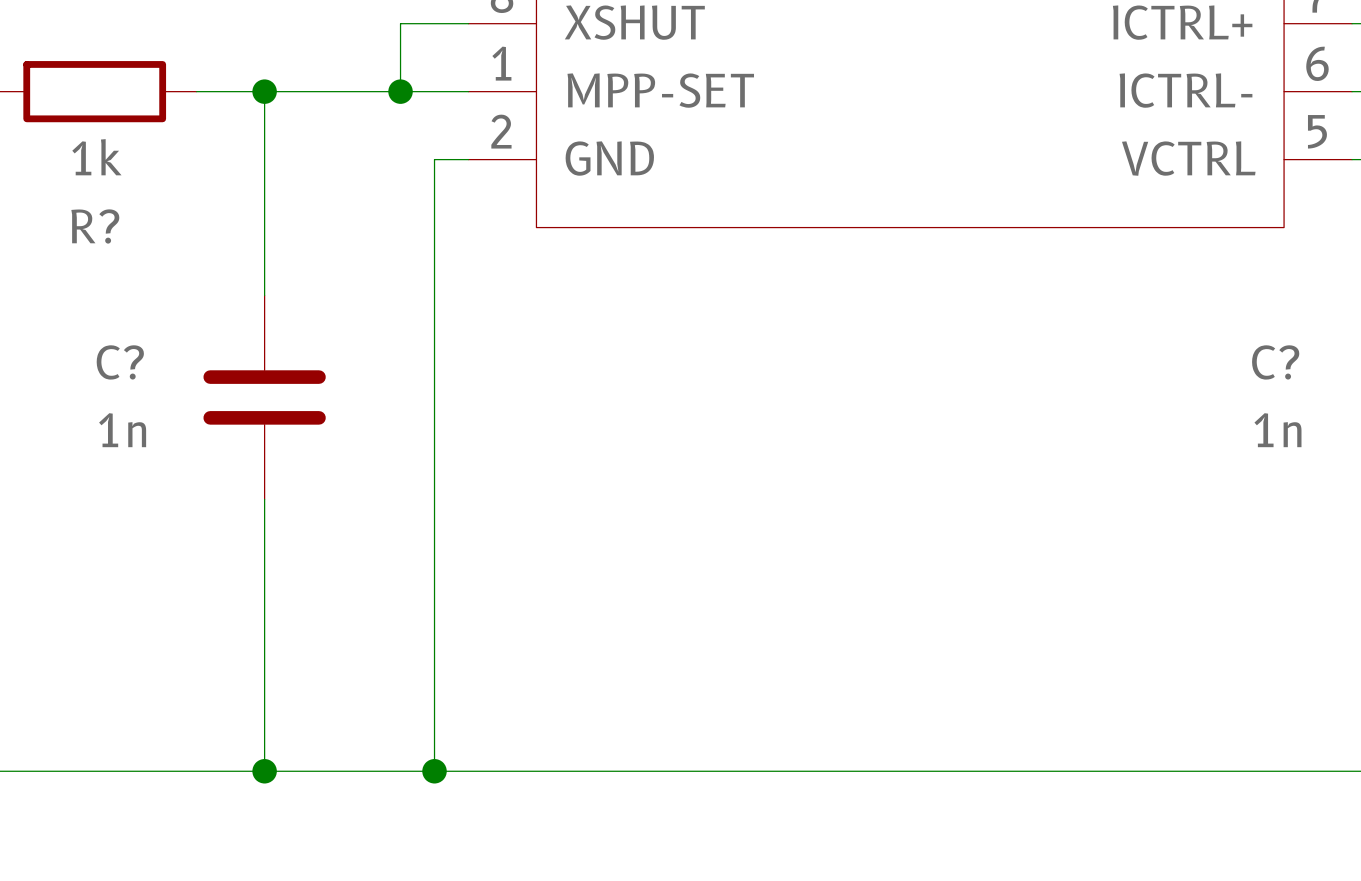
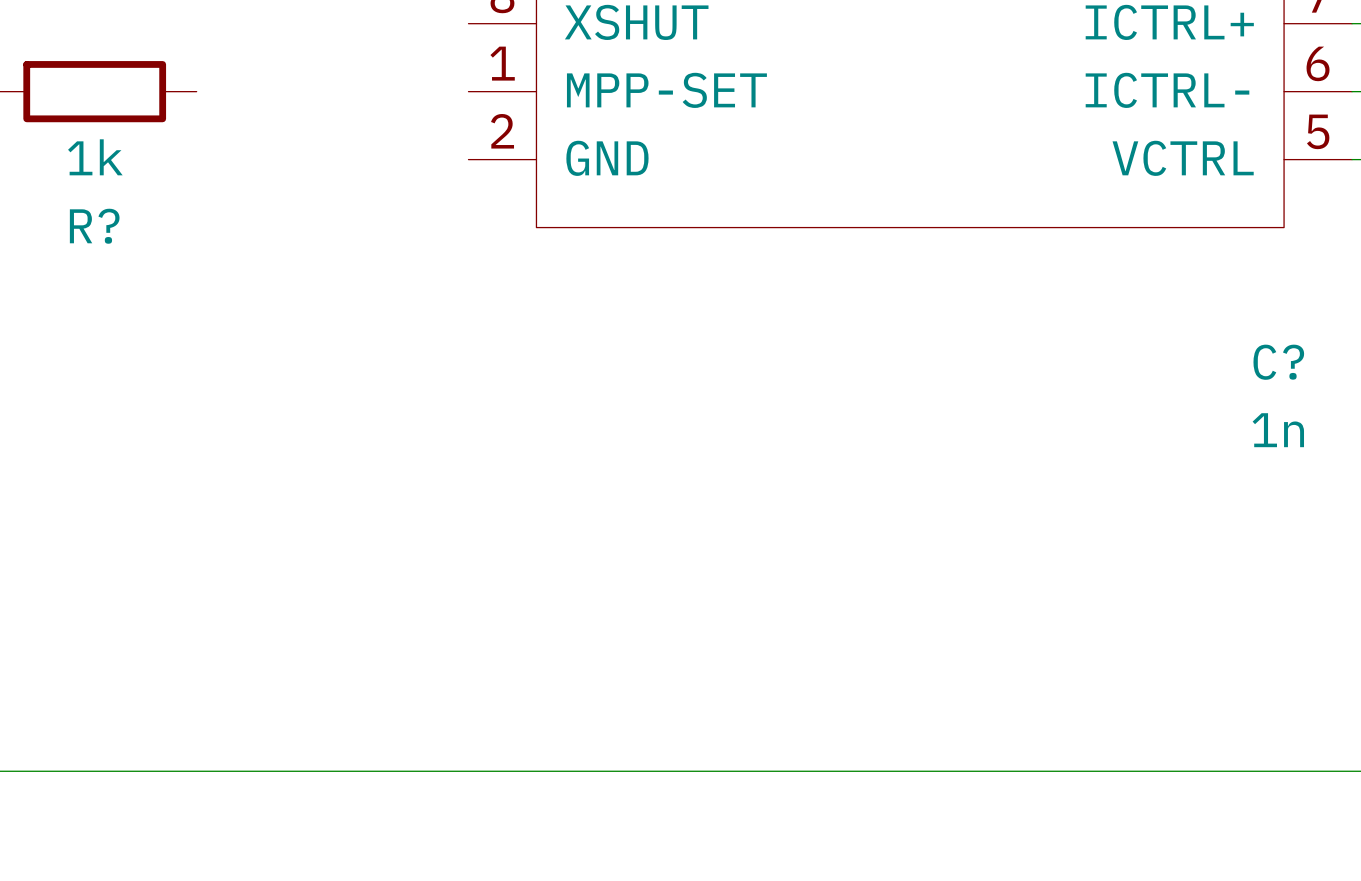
wire: (468, 23) (400, 23) (400, 91) -> none
wire: (196, 91) (468, 91) -> none
wire: (264, 91) (264, 295) -> none
junction: (264, 91) -> none
junction: (400, 91) -> none
wire: (468, 159) (434, 159) (434, 771) -> none
C?: 1n (264, 397) -> none
wire: (264, 499) (264, 771) -> none
junction: (264, 771) -> none
junction: (434, 771) -> none

